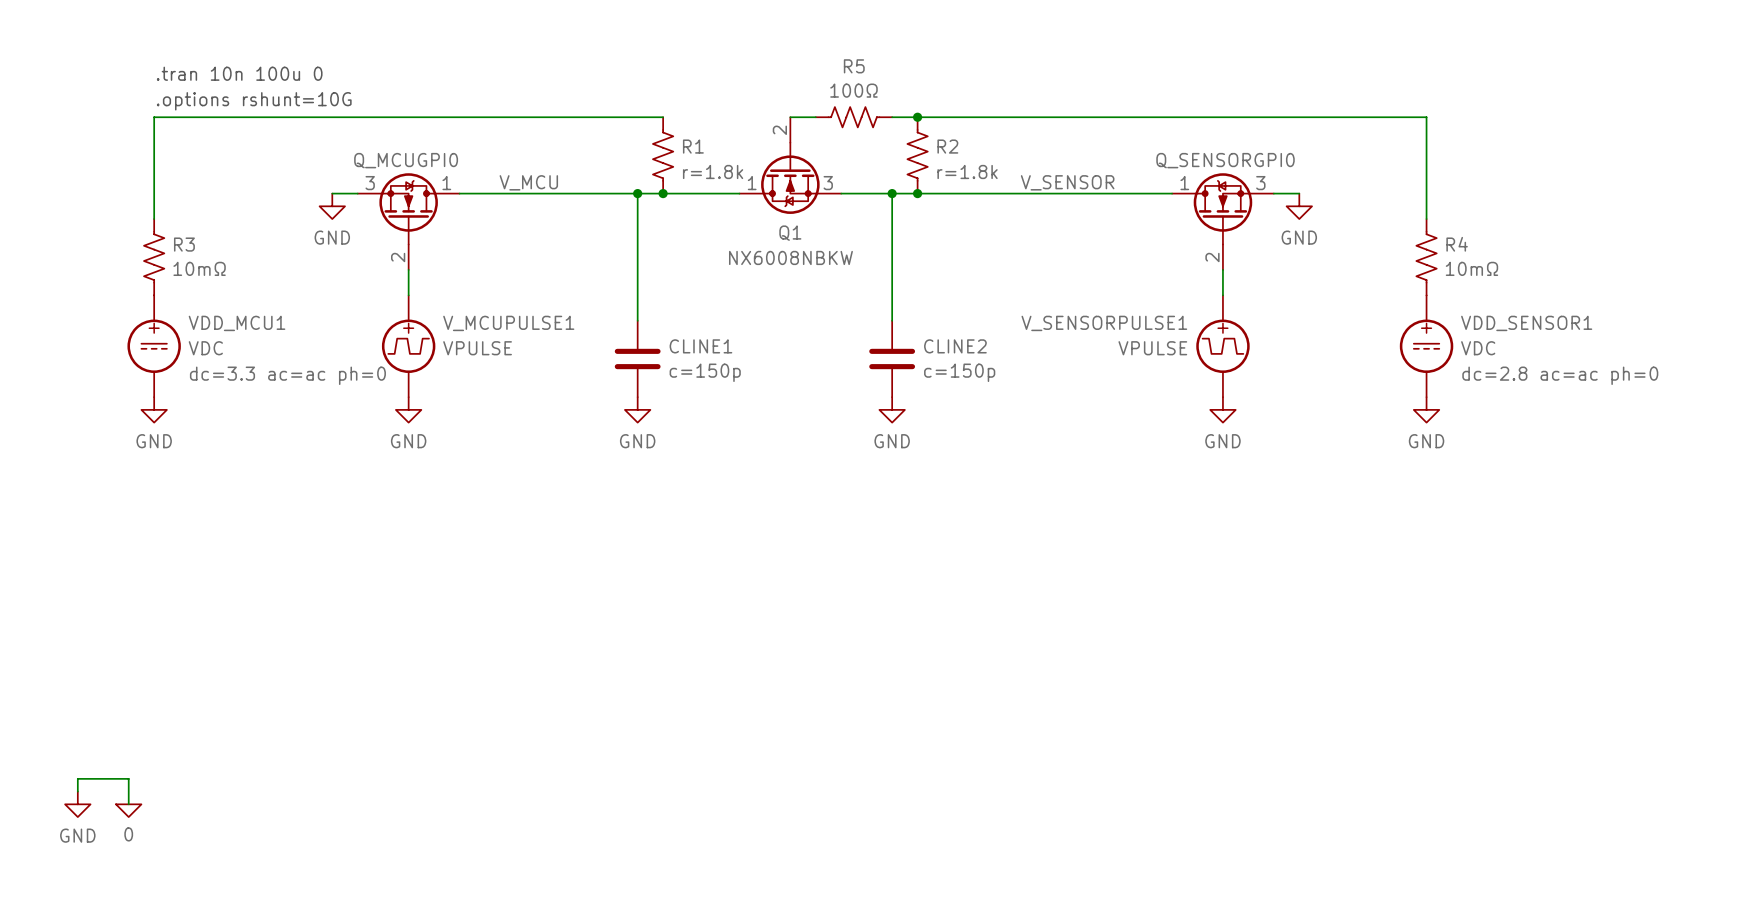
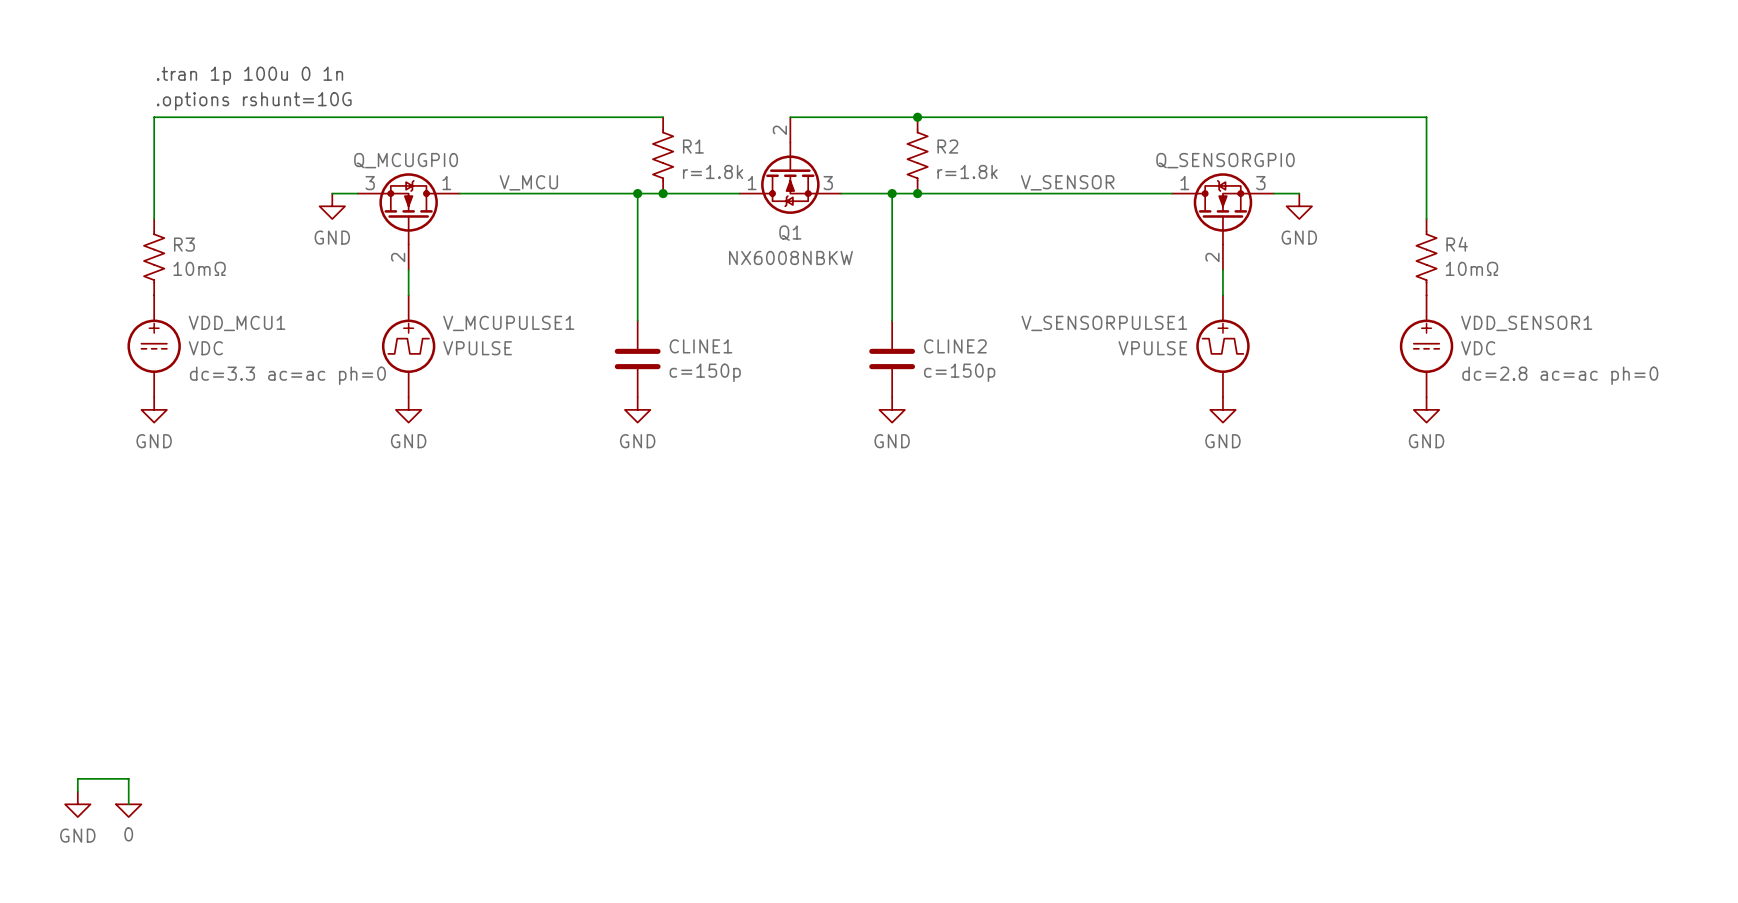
text: .tran 10n 100u 0 (239, 73) -> .tran 1p 100u 0 1n (249, 75)
R5: 100Ω (853, 117) -> none

